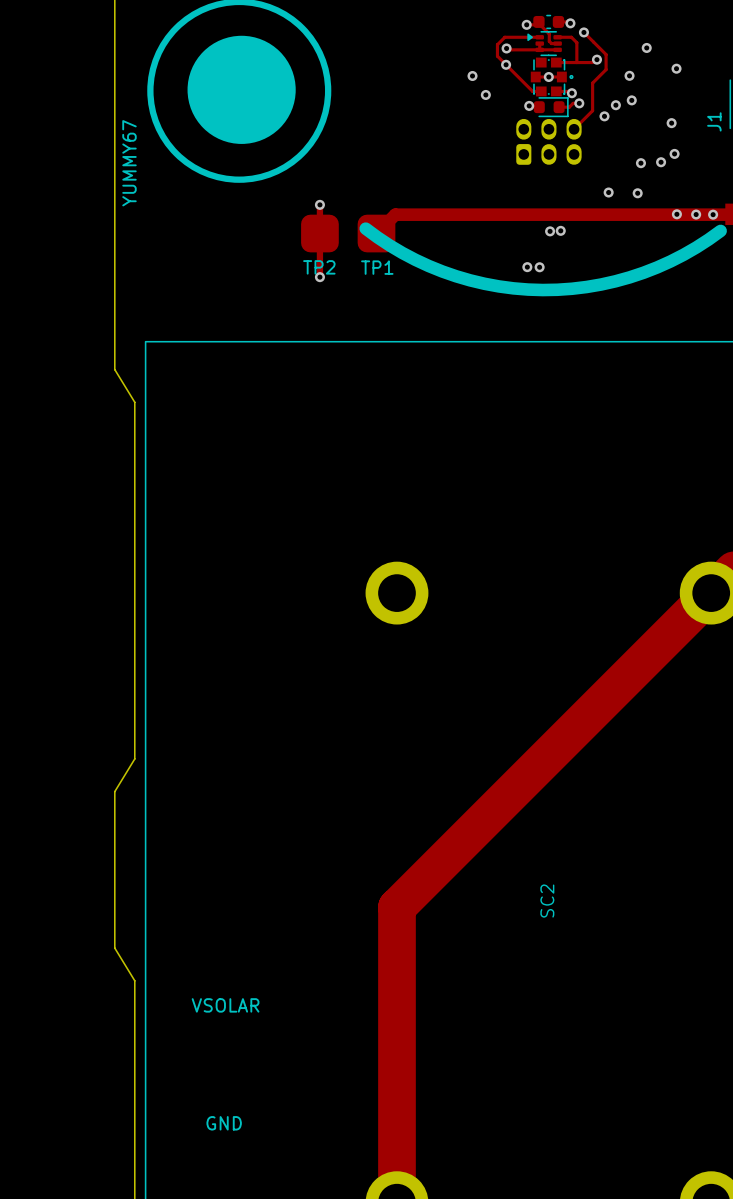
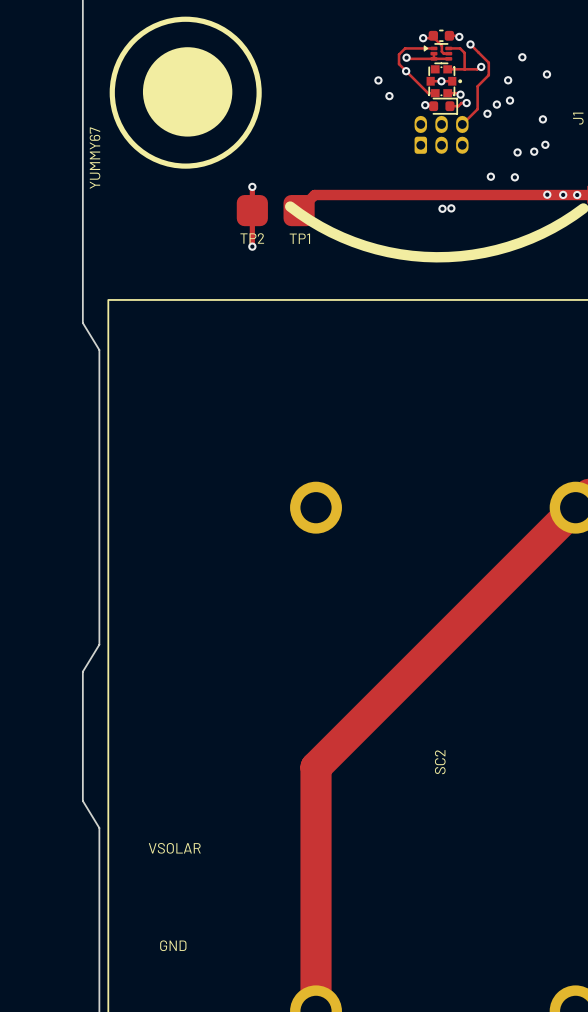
via: (527, 267) -> none
via: (539, 267) -> none

